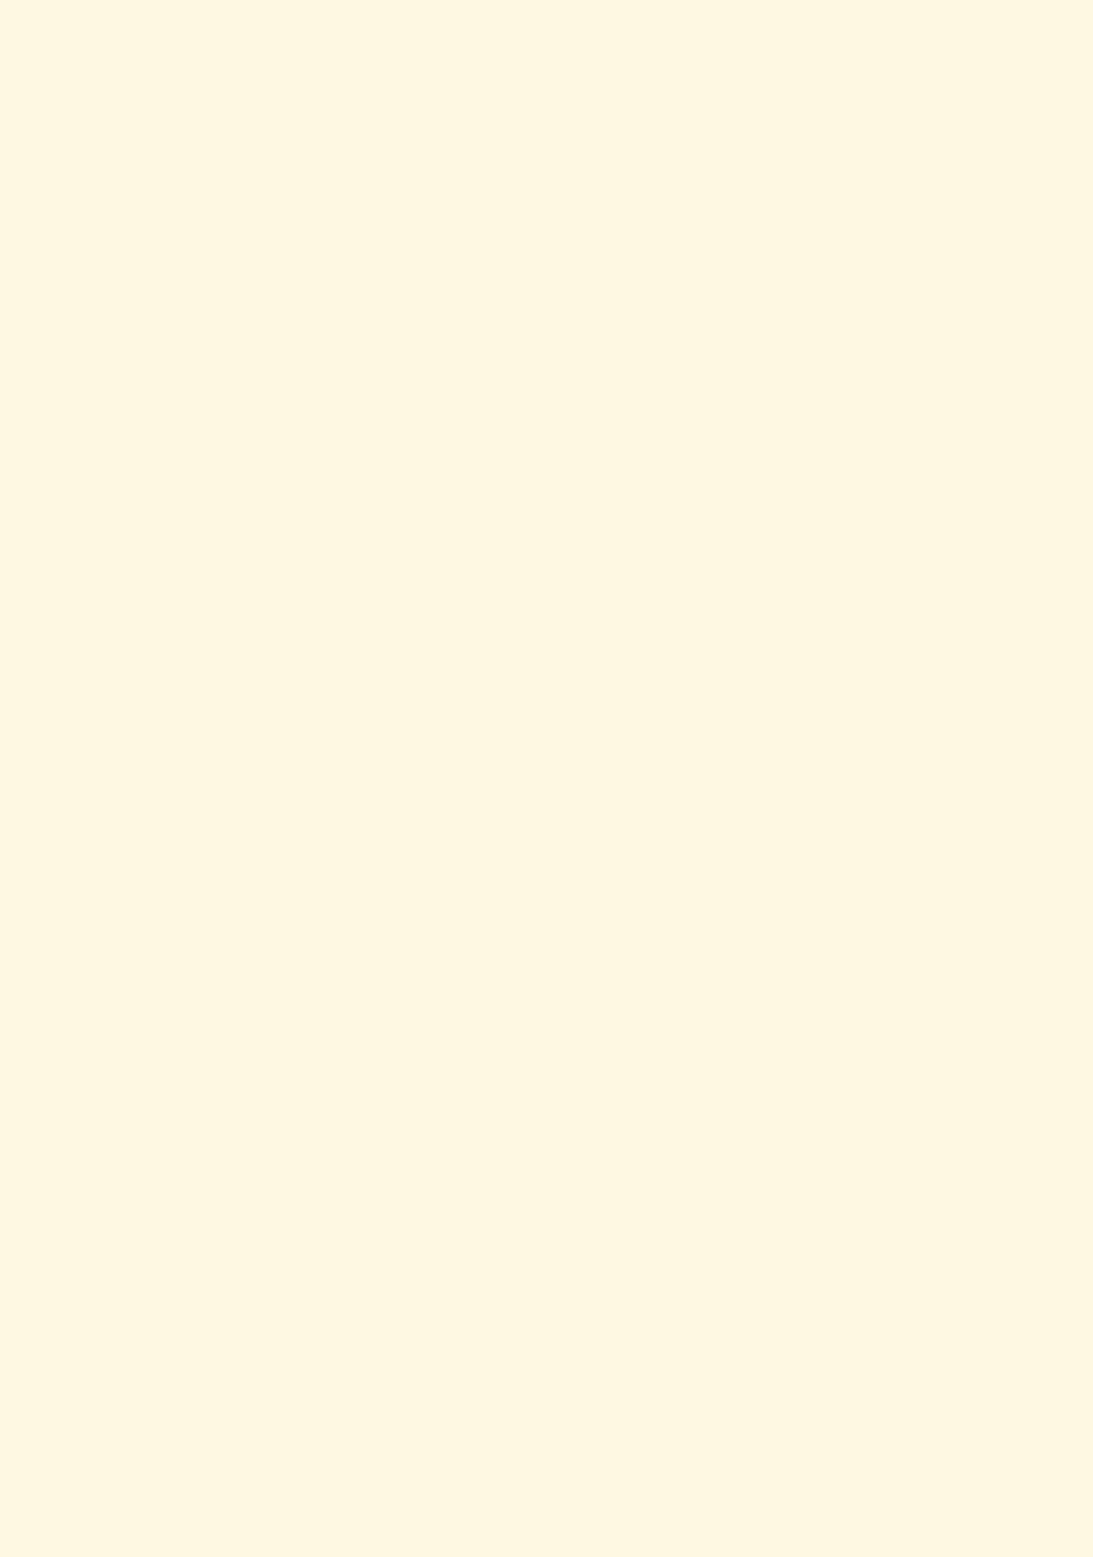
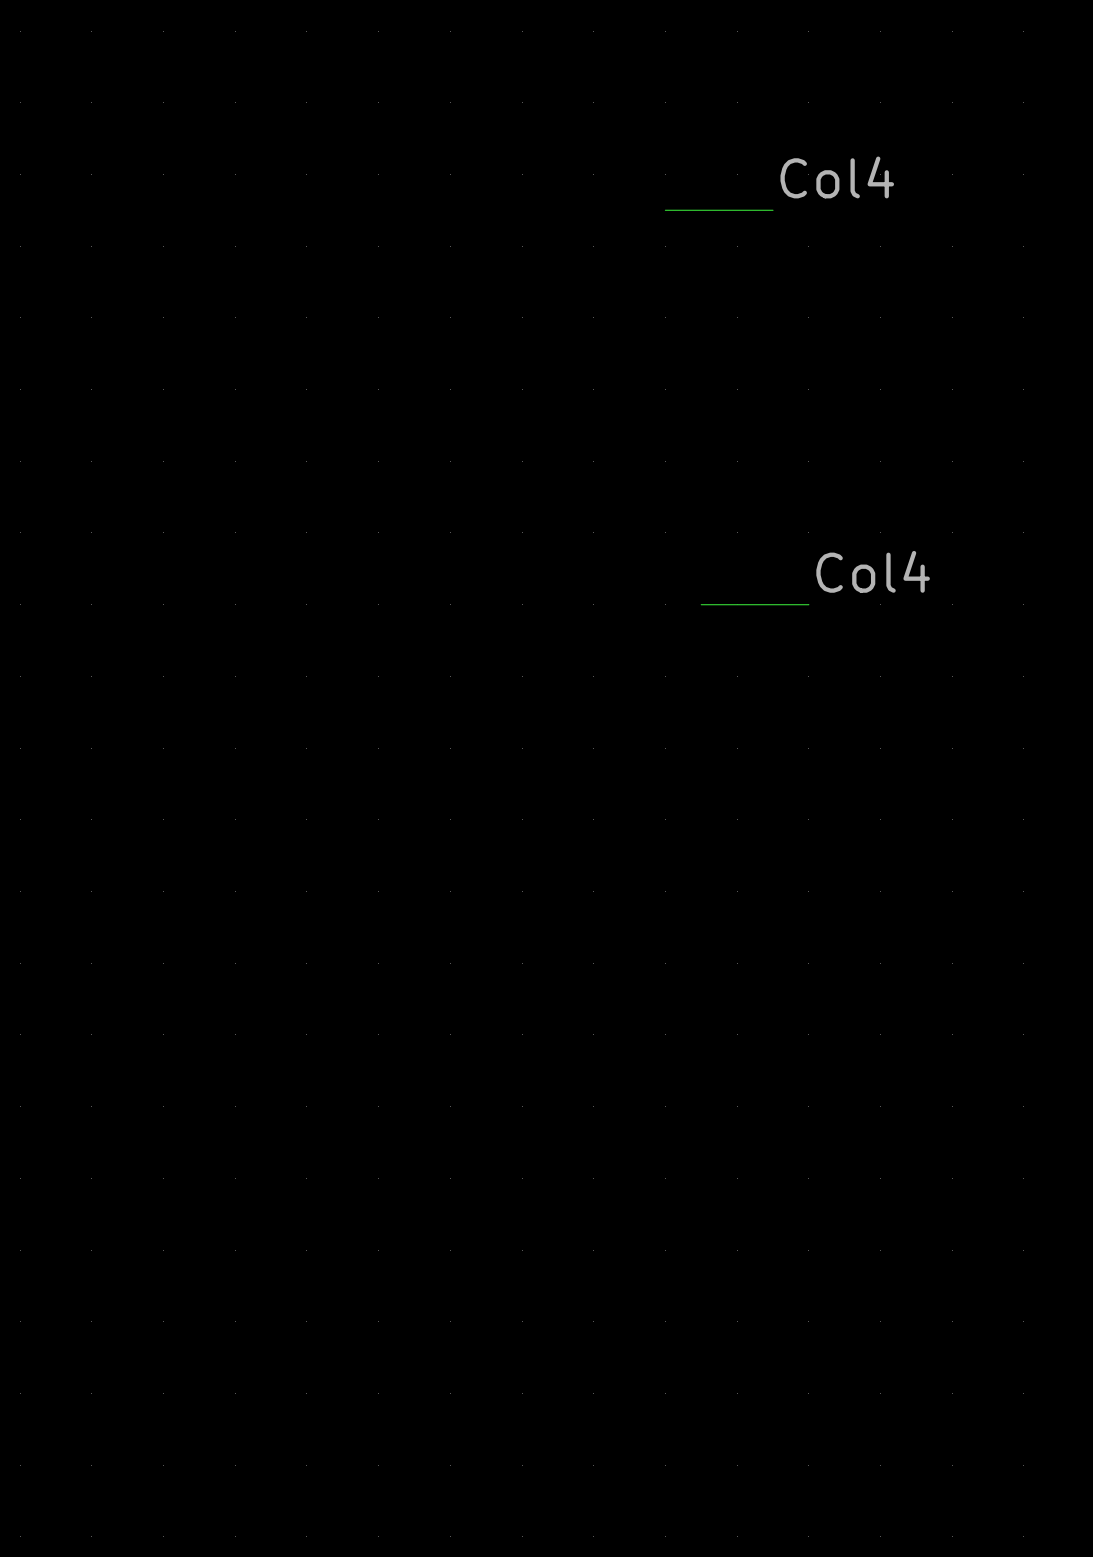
label: none -> Col4 (837, 177)
wire: none -> (665, 210) (772, 210)
label: none -> Col4 (873, 571)
wire: none -> (701, 604) (808, 604)

